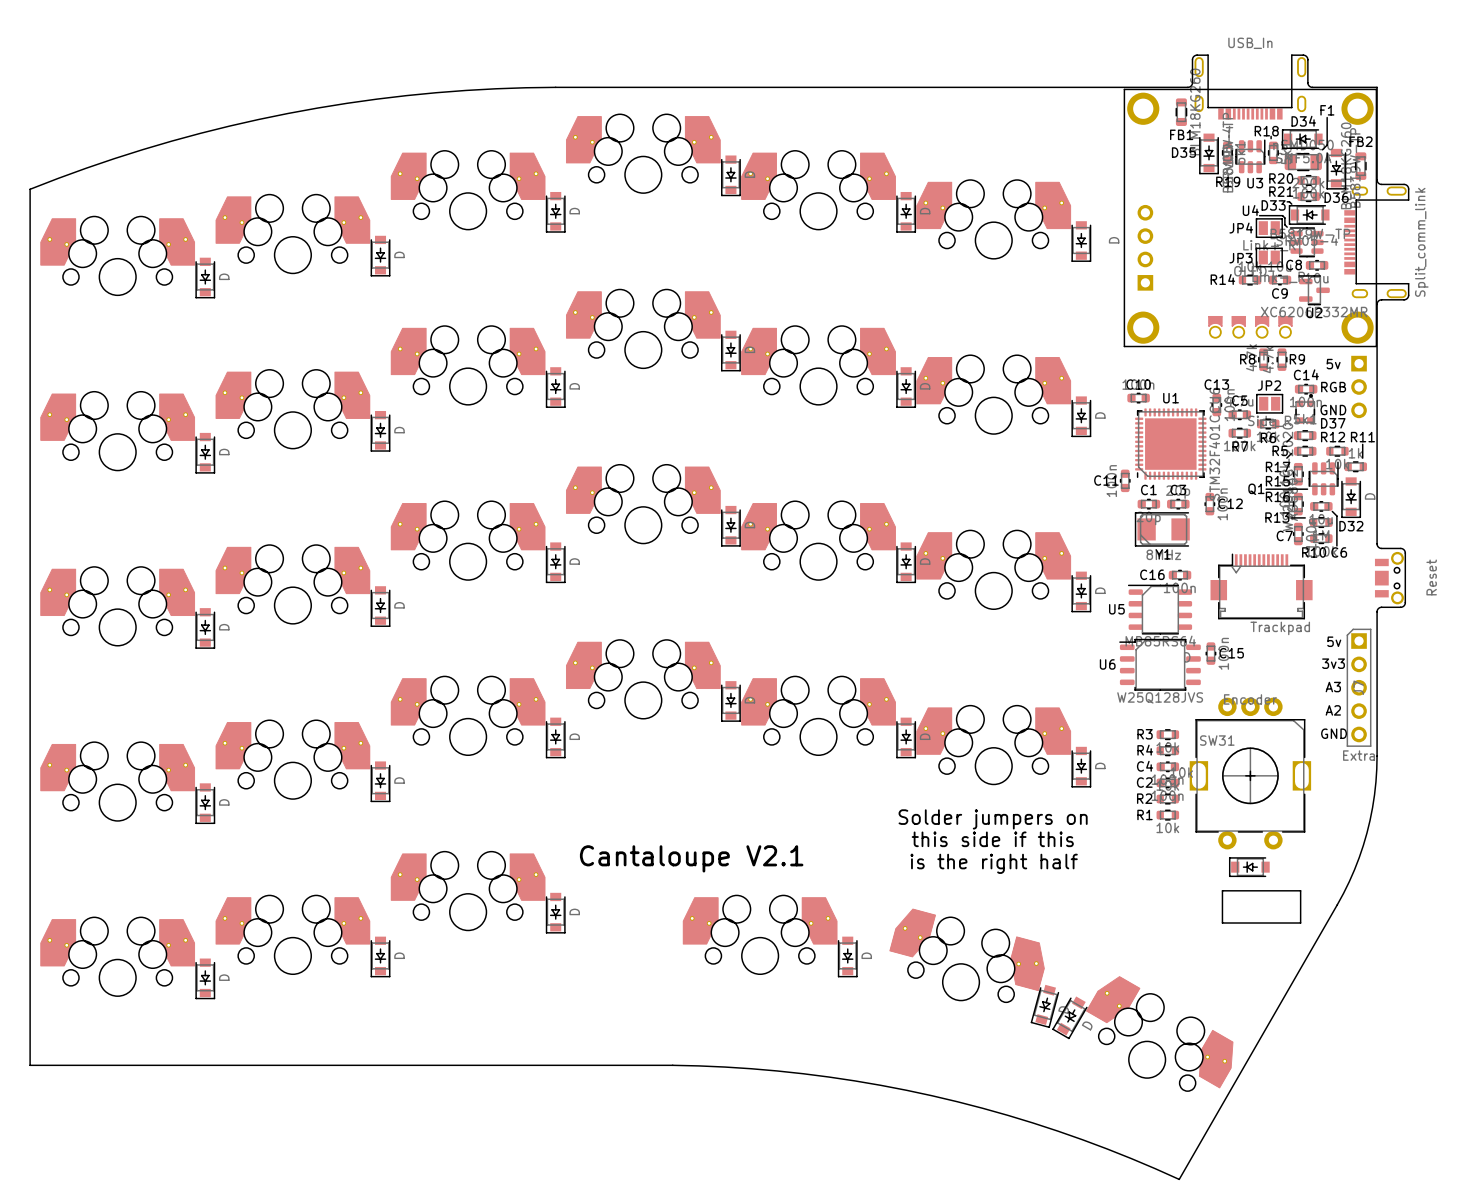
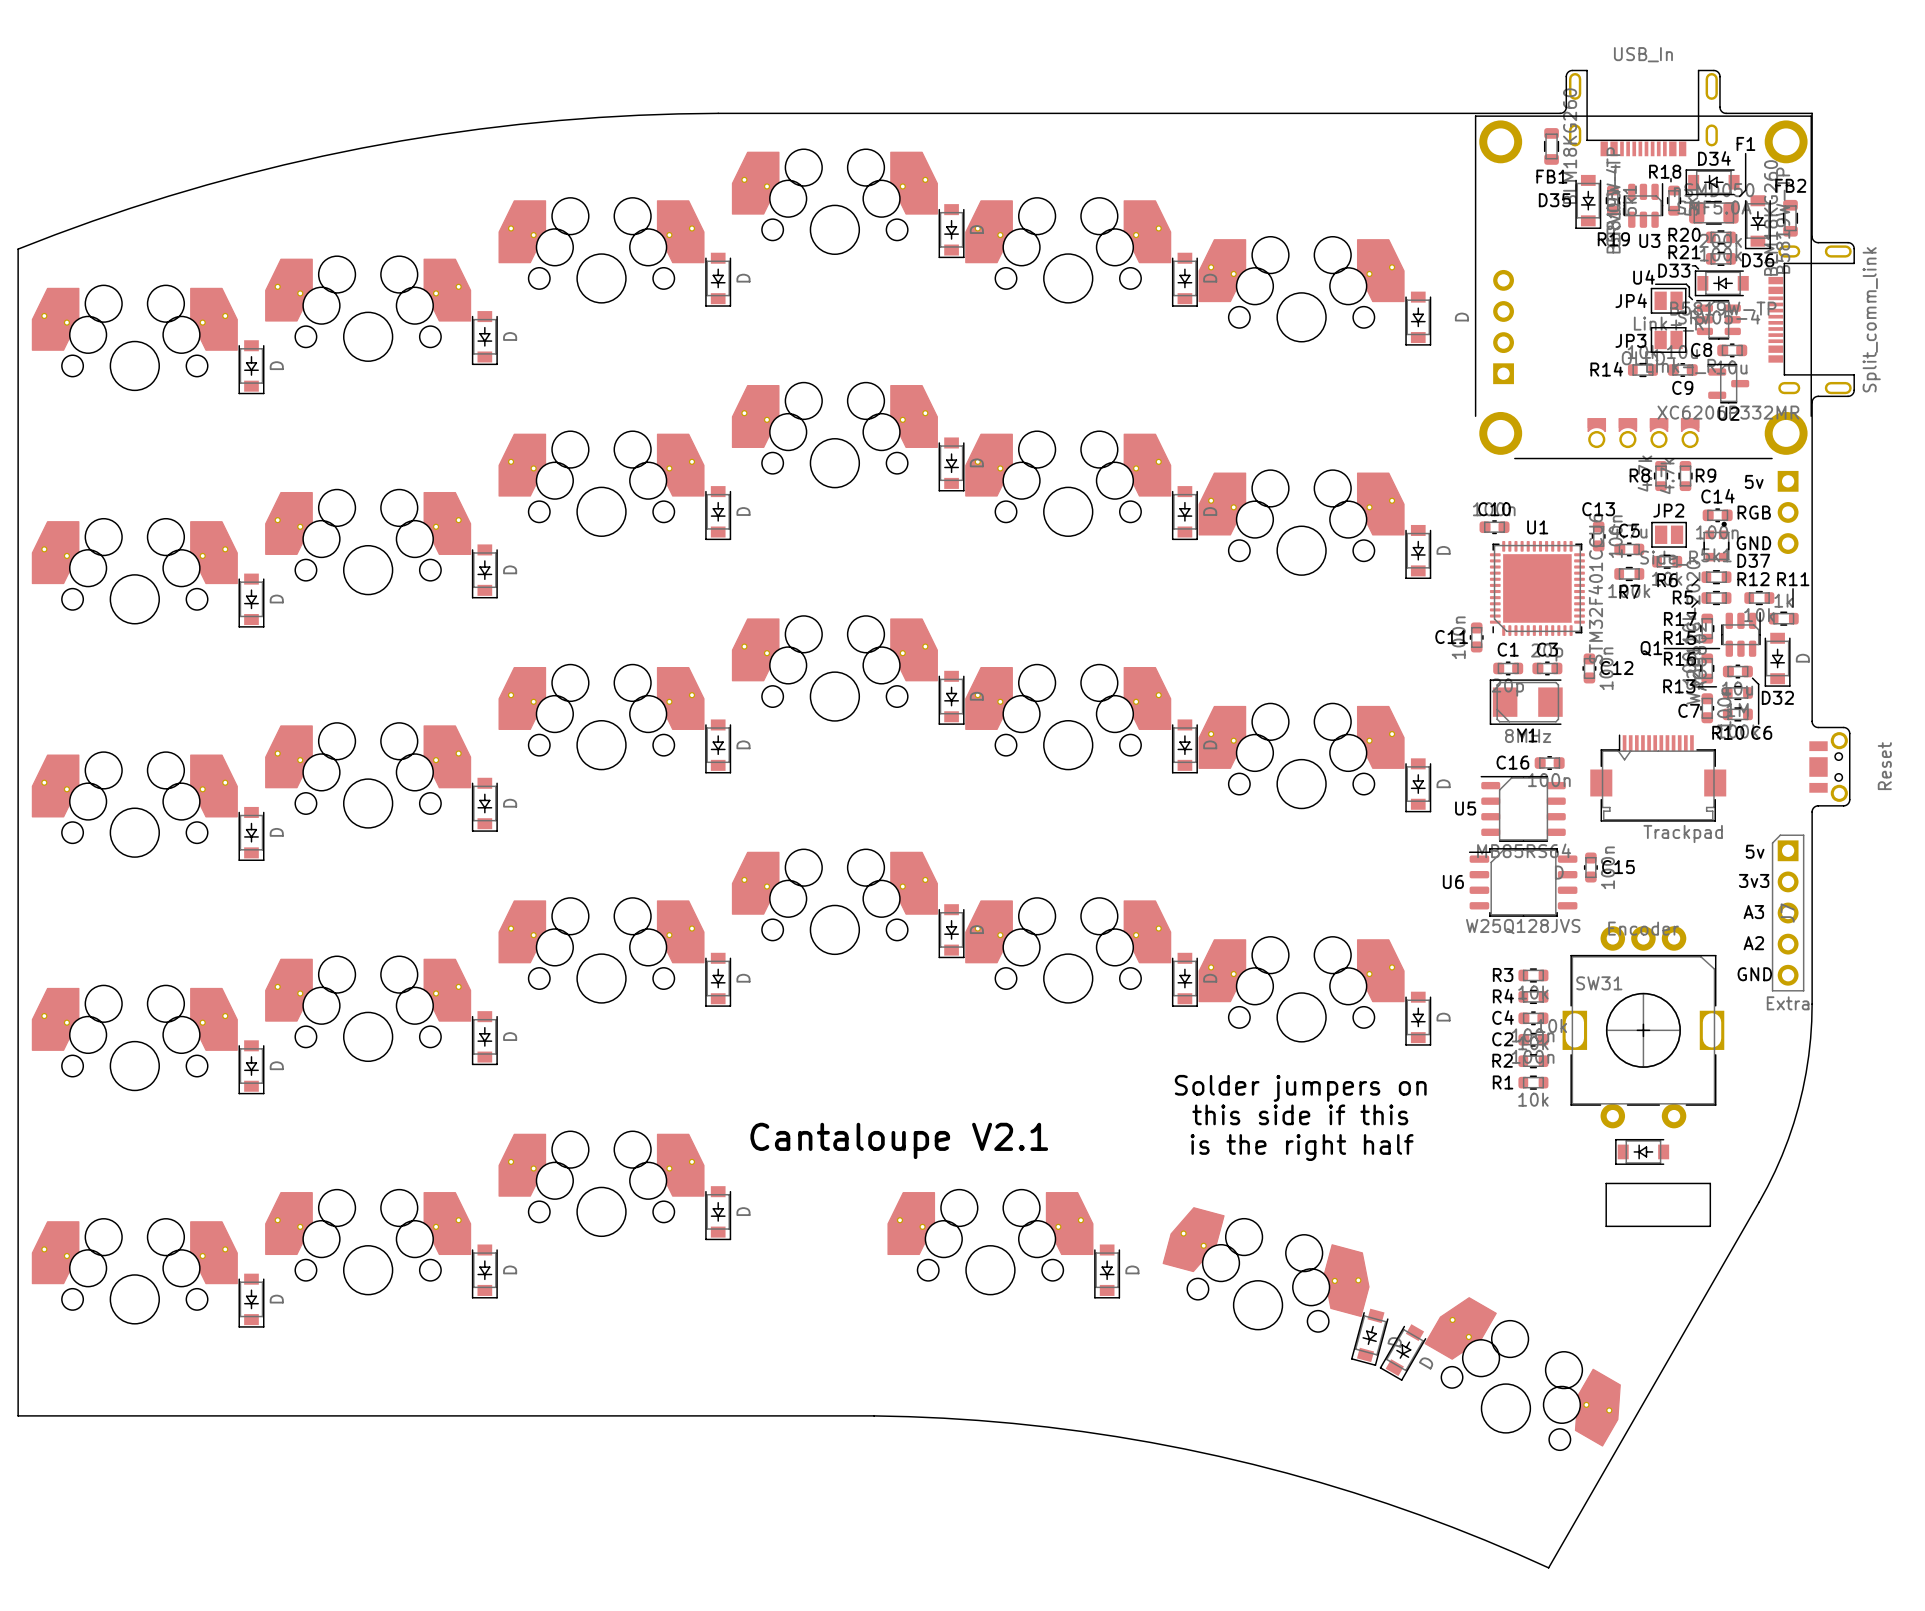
part footprint: [1123, 88, 1377, 348] -> [1474, 115, 1812, 460]

